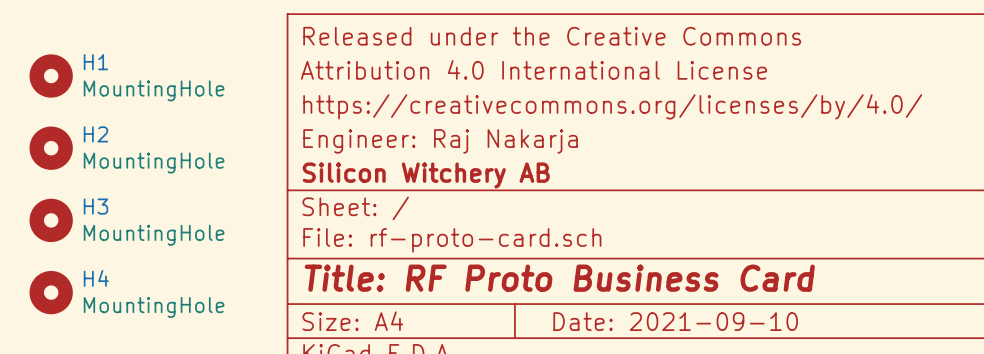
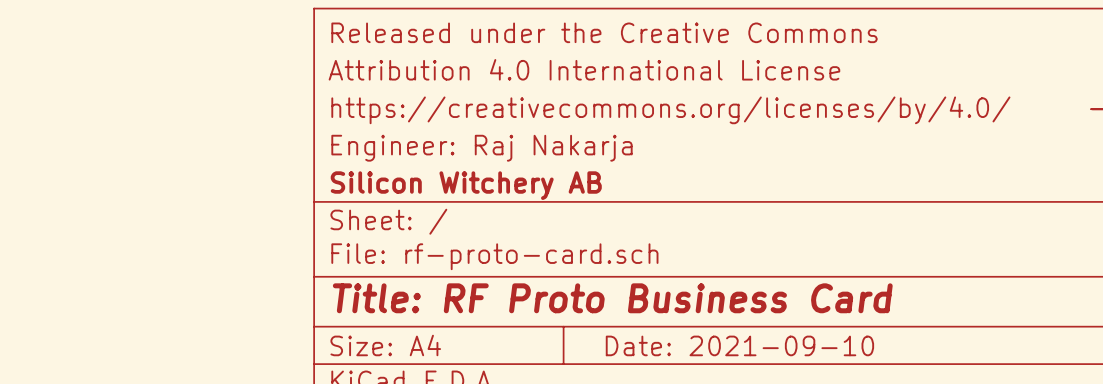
H1: MountingHole (51, 76) -> none
H2: MountingHole (51, 148) -> none
H3: MountingHole (51, 220) -> none
H4: MountingHole (51, 292) -> none

